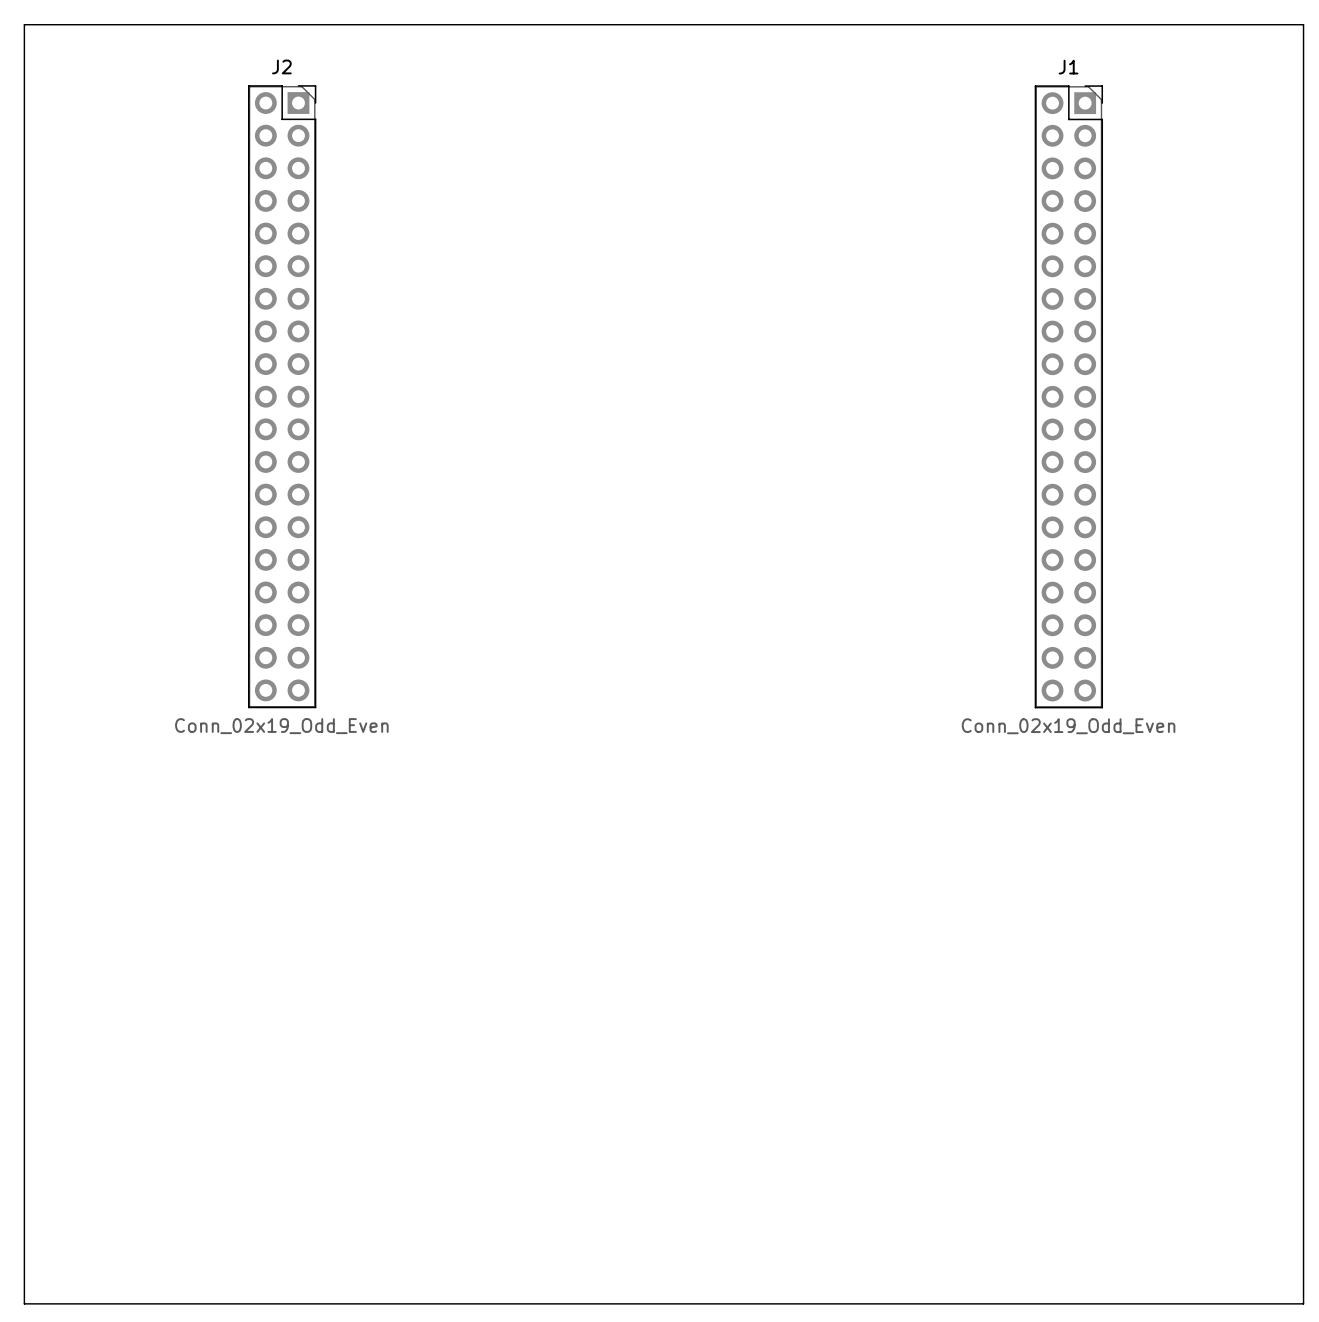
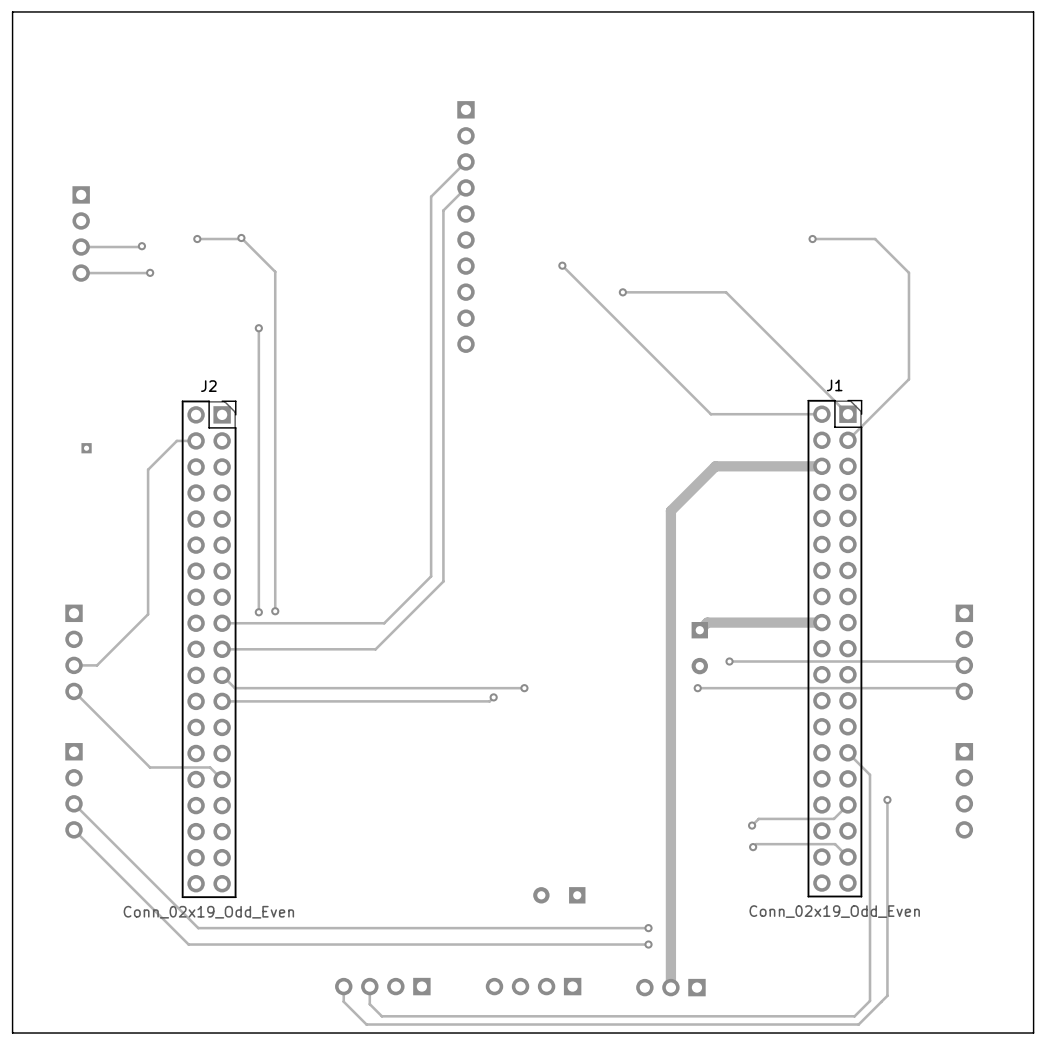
track: none -> (465, 161) (431, 196) (431, 576) (384, 623) (222, 623)
track: none -> (465, 187) (443, 210) (443, 581) (375, 649) (222, 649)
part: none -> (465, 227)
part: none -> (81, 233)
via: none -> (241, 237)
track: none -> (197, 239) (241, 237) (275, 271) (275, 611)
via: none -> (197, 239)
track: none -> (812, 239) (875, 239) (908, 272) (908, 379) (847, 440)
via: none -> (812, 239)
track: none -> (141, 246) (81, 247)
via: none -> (141, 246)
track: none -> (562, 265) (710, 414) (821, 414)
via: none -> (562, 265)
track: none -> (150, 272) (81, 273)
via: none -> (150, 272)
track: none -> (622, 292) (726, 292) (847, 414)
via: none -> (622, 292)
J2 position: (282, 396) -> (209, 649)
J1 position: (1068, 396) -> (834, 648)
track: none -> (258, 328) (258, 612)
via: none -> (258, 328)
track: none -> (196, 440) (176, 440) (148, 469) (148, 614) (97, 665) (74, 665)
part: none -> (86, 448)
track: none -> (821, 466) (715, 466) (670, 510) (670, 987)
via: none -> (275, 611)
via: none -> (258, 612)
track: none -> (821, 622) (707, 622) (699, 630)
part: none -> (699, 648)
part: none -> (74, 652)
part: none -> (964, 652)
track: none -> (729, 661) (960, 661) (964, 665)
via: none -> (729, 661)
track: none -> (222, 675) (234, 688) (524, 688)
via: none -> (524, 688)
track: none -> (697, 688) (961, 688) (964, 691)
via: none -> (697, 688)
track: none -> (74, 691) (150, 767) (210, 767) (222, 779)
track: none -> (493, 697) (489, 701) (222, 701)
via: none -> (493, 697)
track: none -> (847, 752) (870, 774) (870, 1000) (854, 1016) (381, 1016) (369, 1004) (369, 986)
part: none -> (74, 790)
part: none -> (964, 790)
track: none -> (887, 799) (887, 995) (858, 1024) (366, 1024) (343, 1001) (343, 986)
via: none -> (887, 799)
track: none -> (74, 803) (198, 928) (649, 928)
track: none -> (847, 804) (833, 818) (758, 818) (752, 825)
via: none -> (752, 825)
track: none -> (74, 829) (188, 944) (648, 944)
track: none -> (753, 847) (756, 844) (835, 844) (847, 857)
via: none -> (753, 847)
part: none -> (559, 895)
via: none -> (648, 928)
via: none -> (648, 944)
part: none -> (382, 986)
part: none -> (533, 986)
part: none -> (670, 987)

